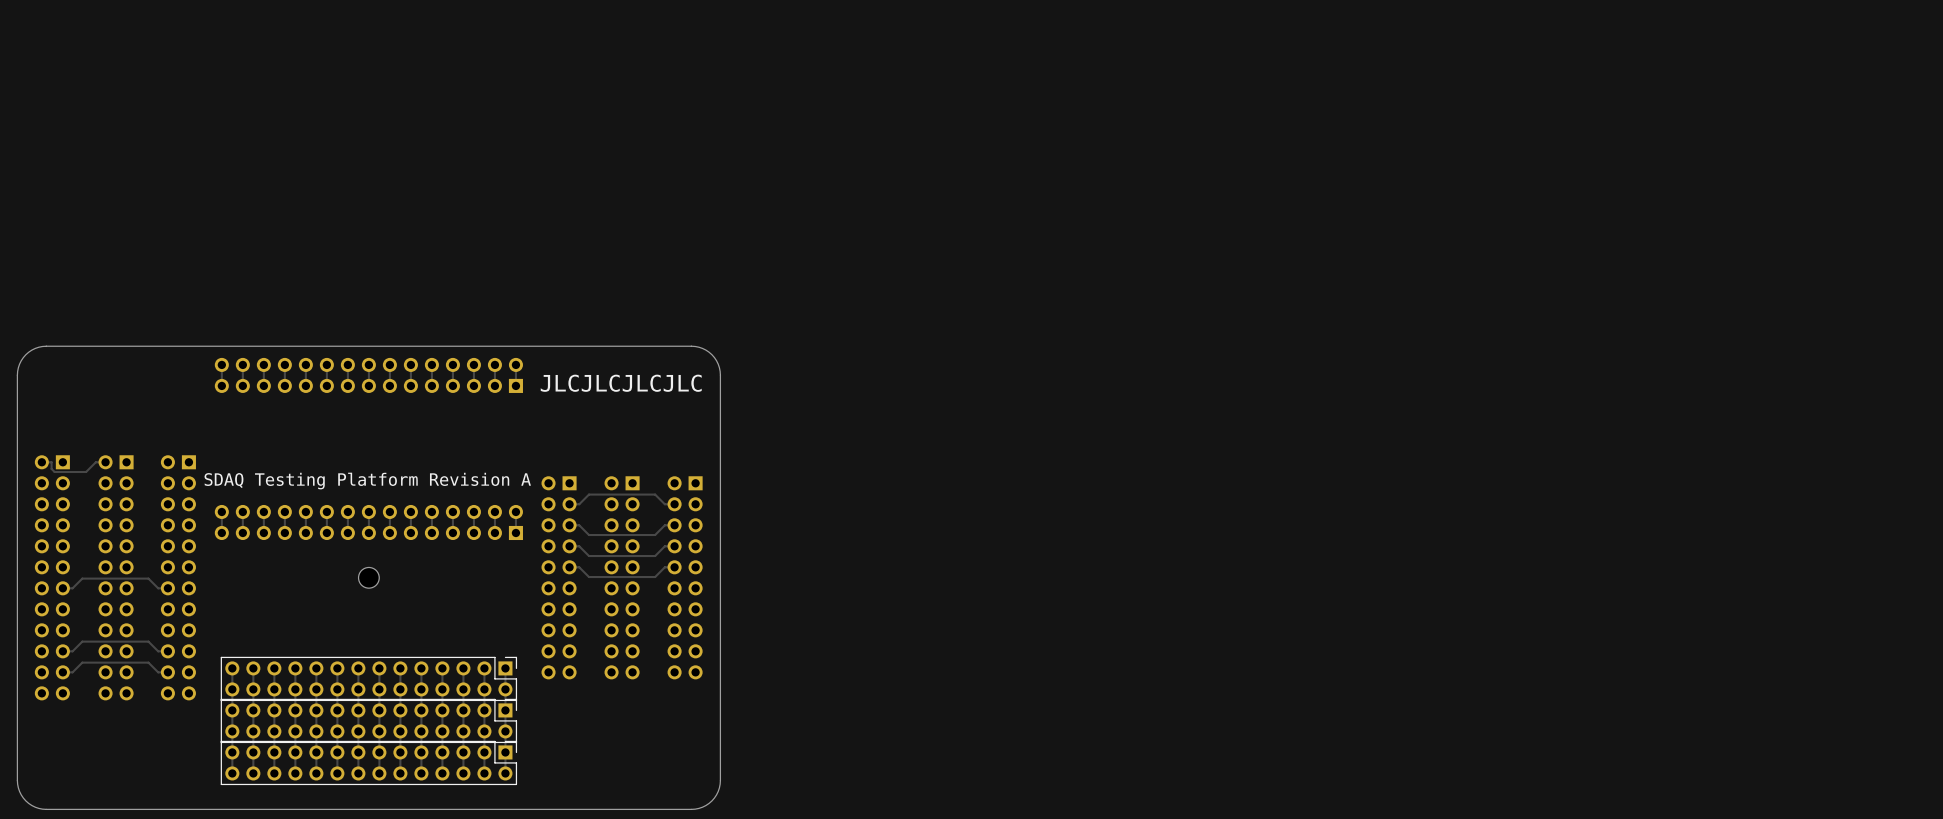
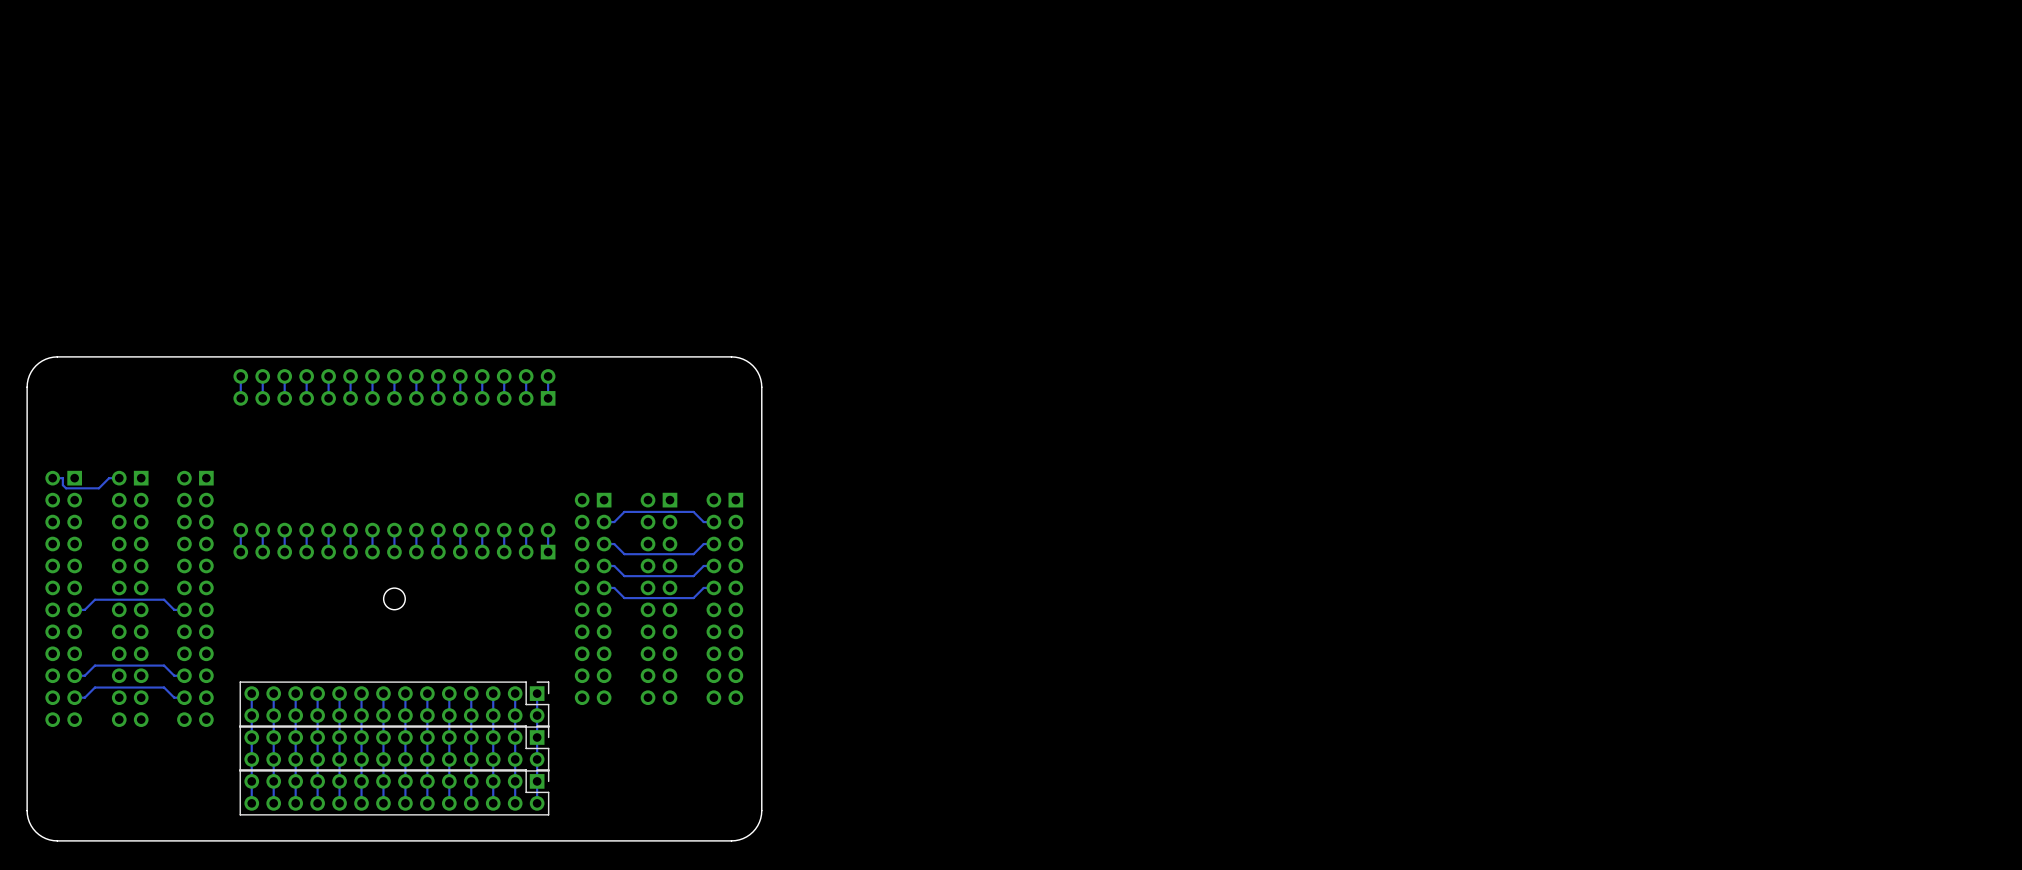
text: JLCJLCJLCJLC (621, 383) -> none
text: SDAQ Testing Platform Revision A (367, 481) -> none

